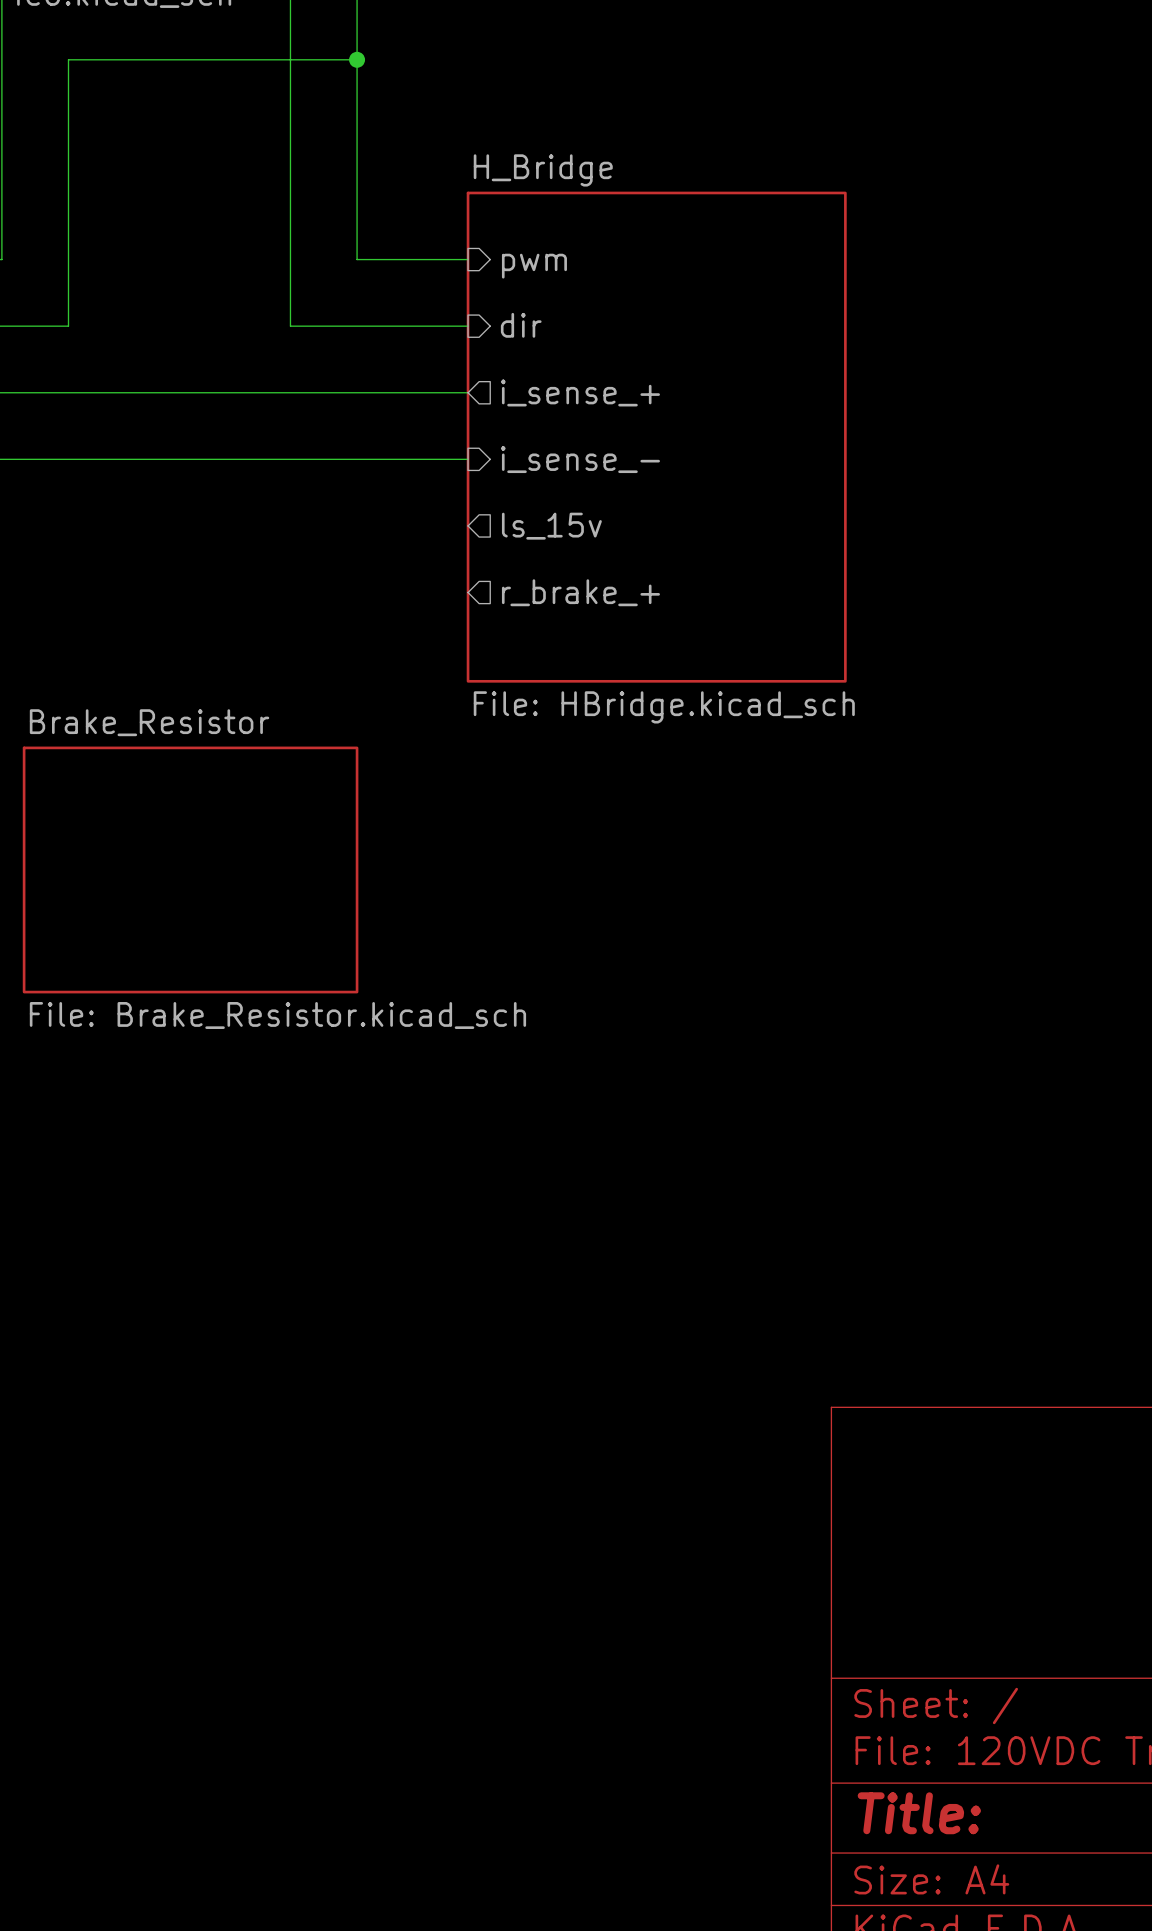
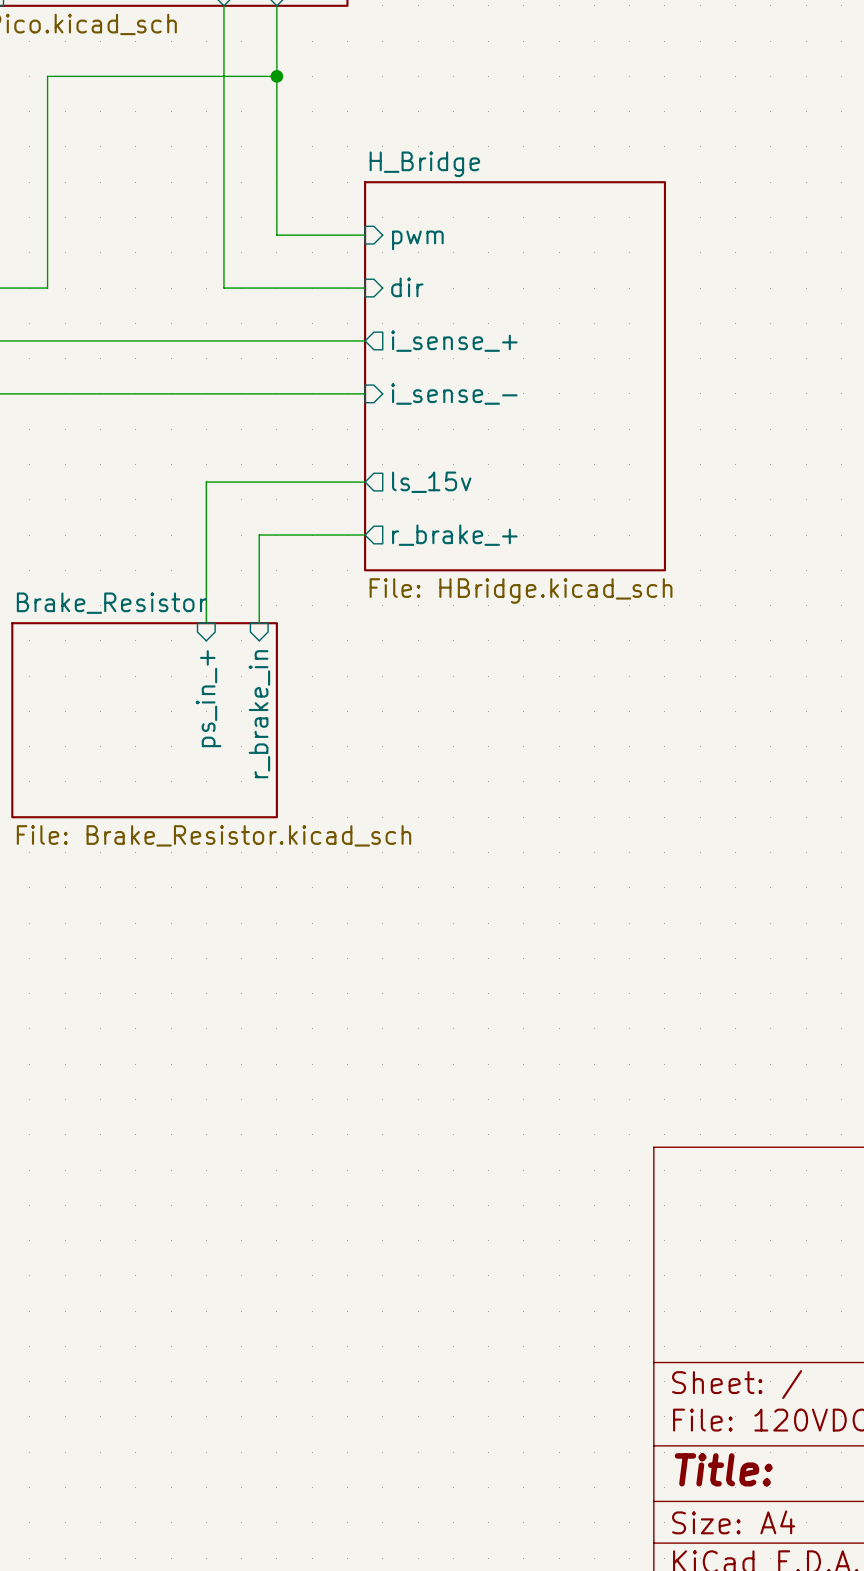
sheet pin position: ls_15v (551, 526) -> ls_15v (431, 482)
wire: none -> (365, 482) (206, 482) (206, 623)
sheet pin position: r_brake_+ (580, 592) -> r_brake_+ (454, 535)
wire: none -> (365, 535) (259, 535) (259, 623)
sheet pin: none -> ps_in_+ (208, 698)
sheet pin: none -> r_brake_in (259, 714)

